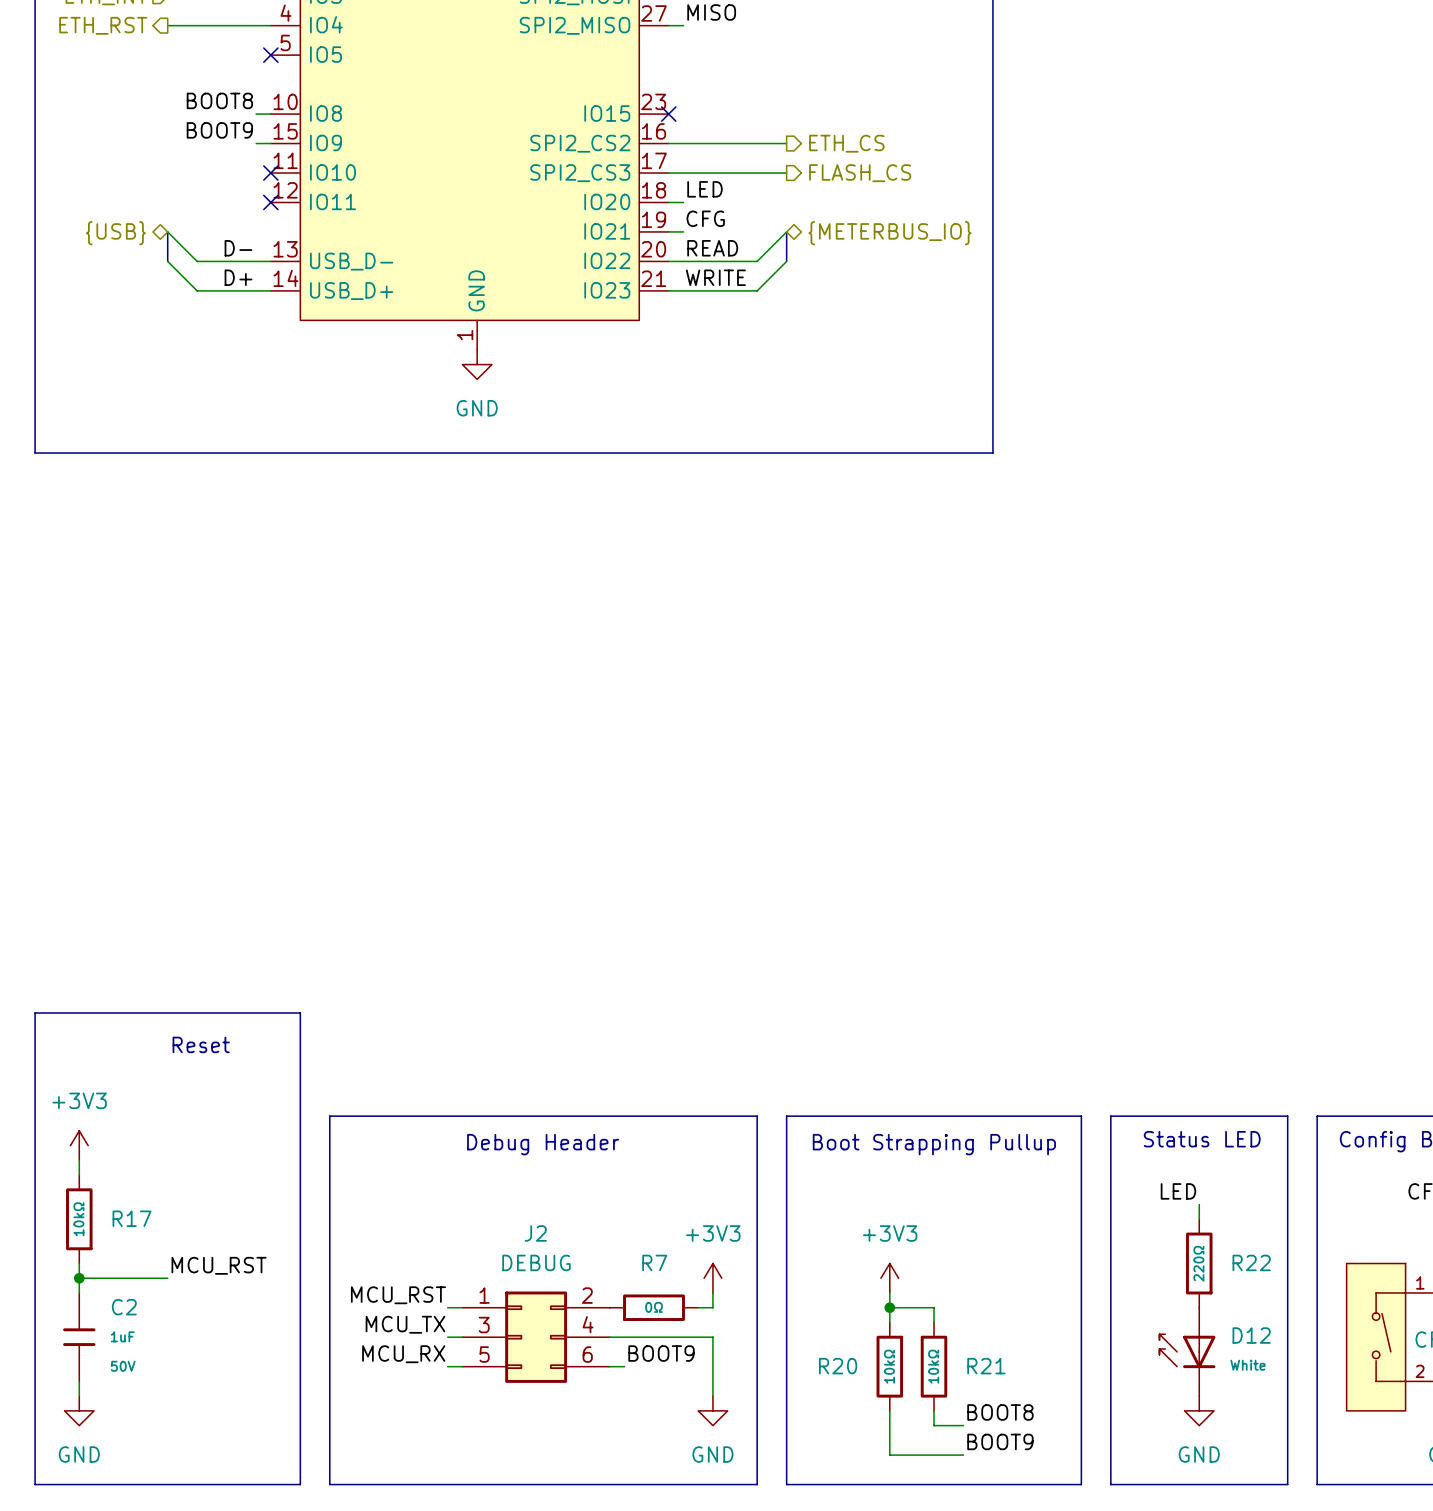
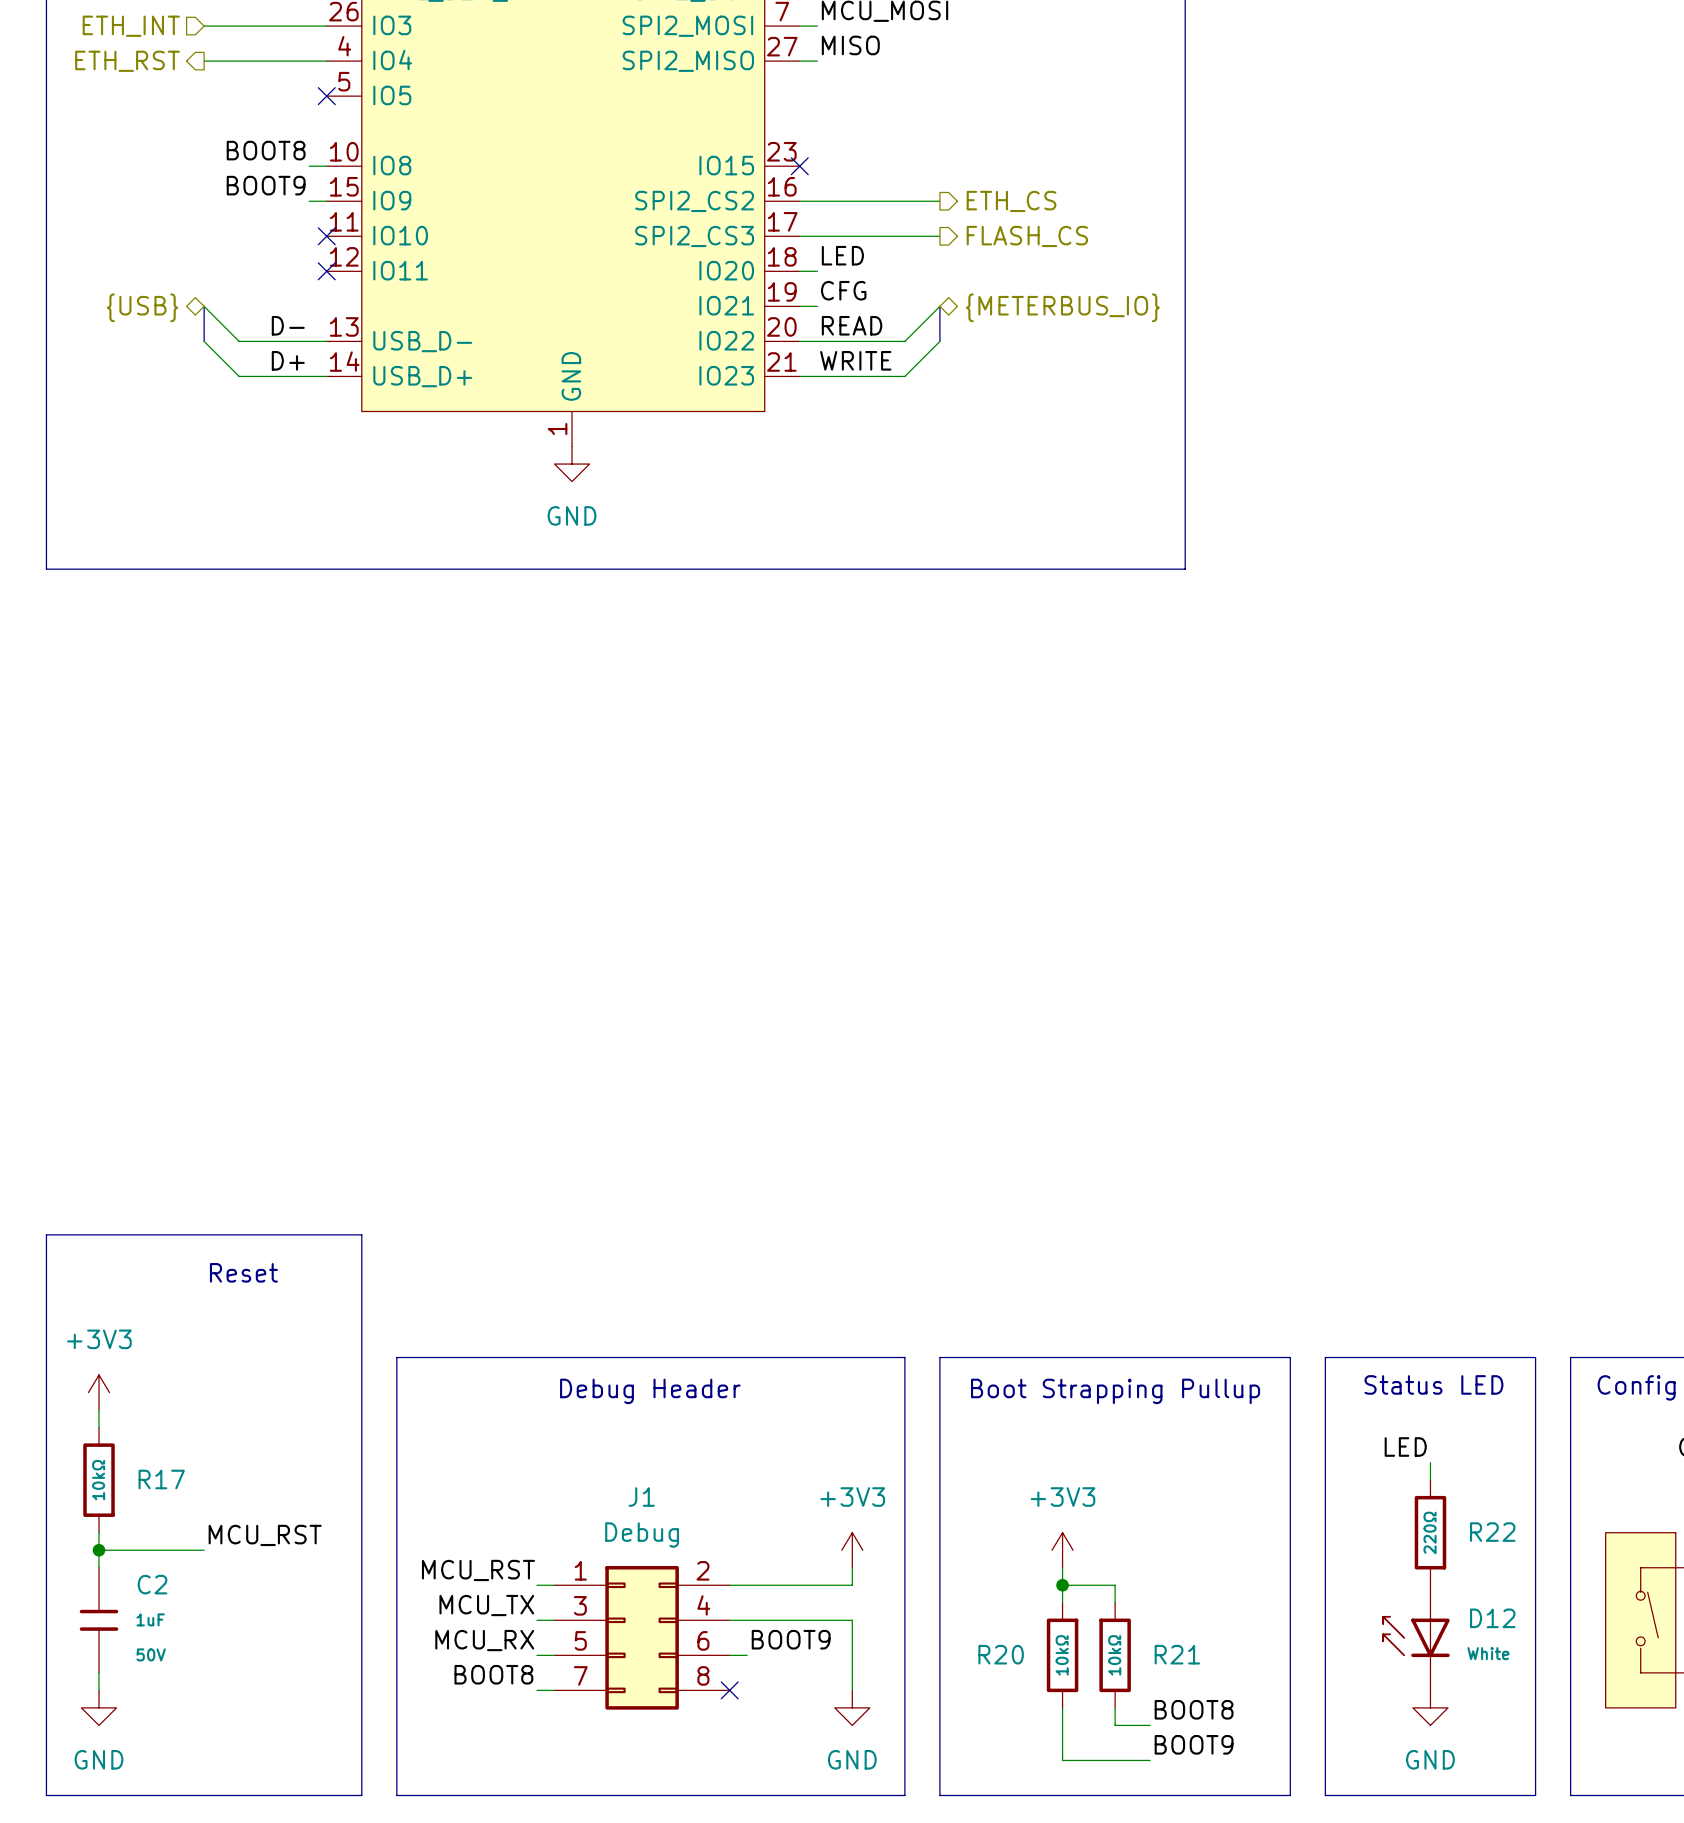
wire: none -> (729, 1585) (834, 1585)
R7: 0Ω (654, 1307) -> none
J2: DEBUG (536, 1337) -> none
J1: none -> Debug (642, 1637)
label: none -> BOOT8 (493, 1674)
wire: none -> (536, 1690) (554, 1690)
no-connect mark: none -> (729, 1690)

